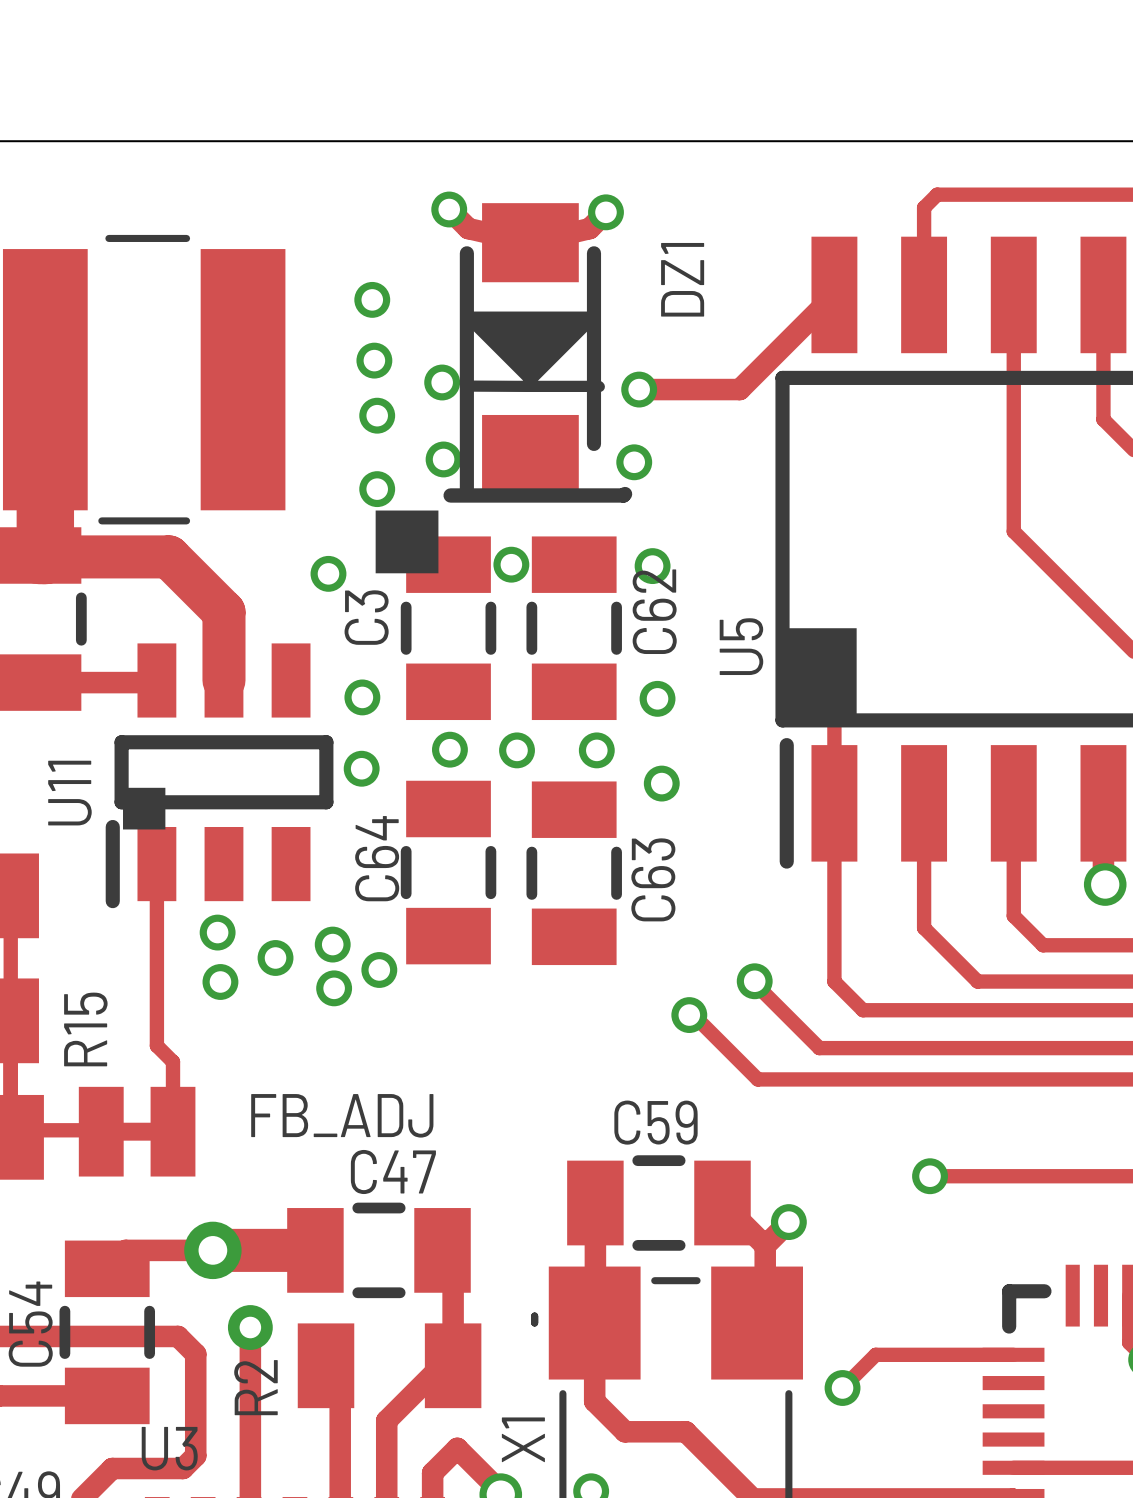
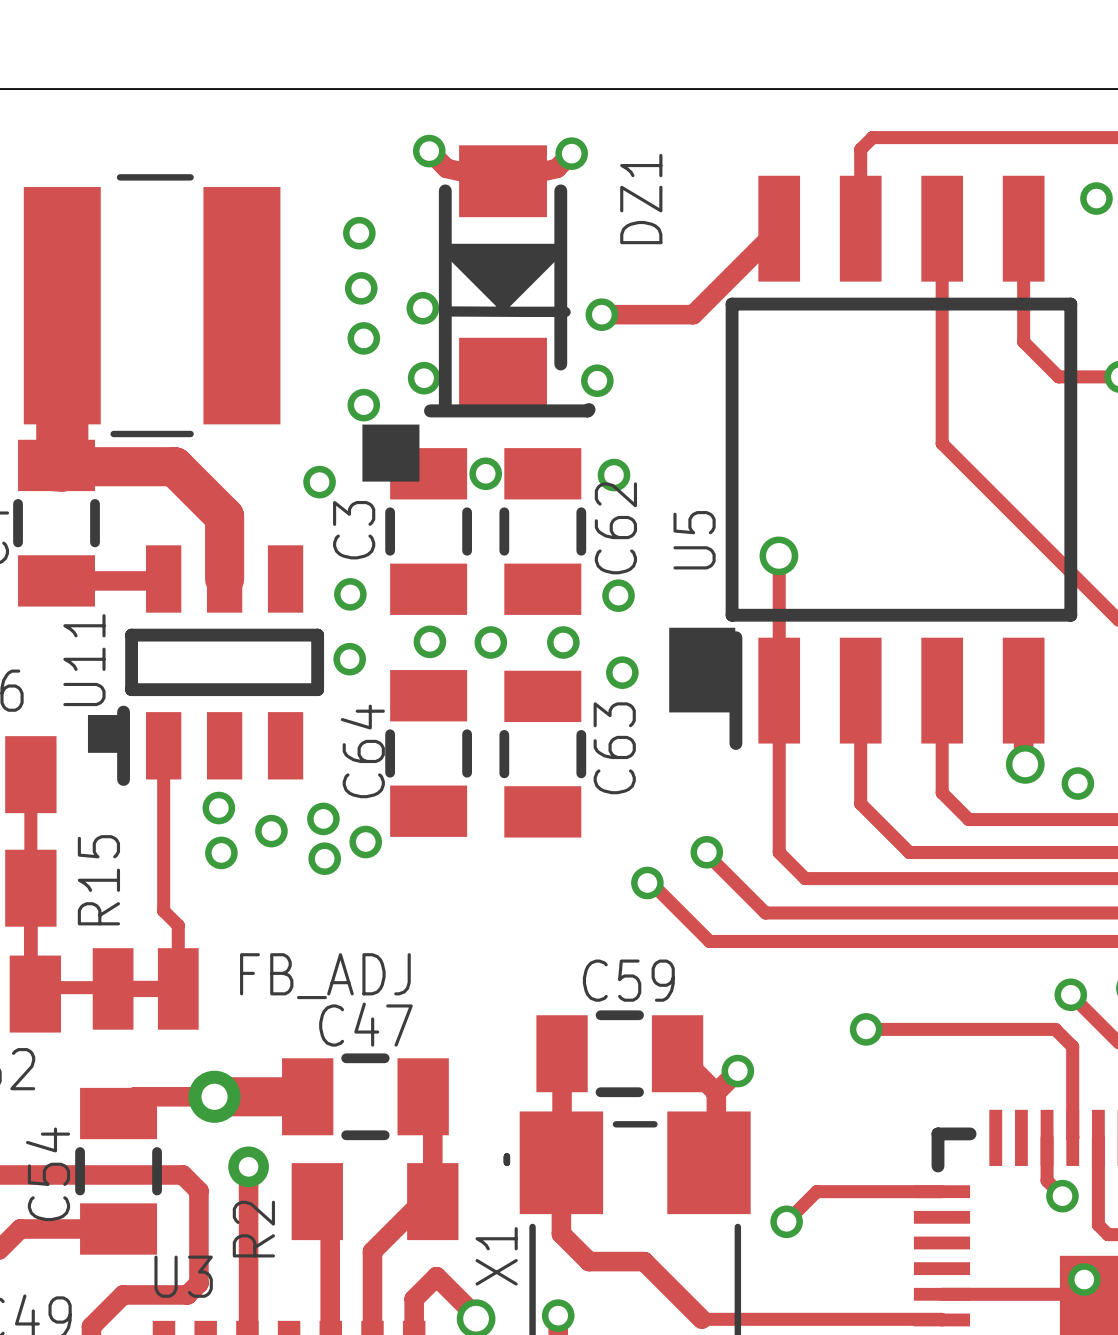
drawing position: (820, 674) -> (702, 670)
drawing position: (144, 808) -> (107, 733)

